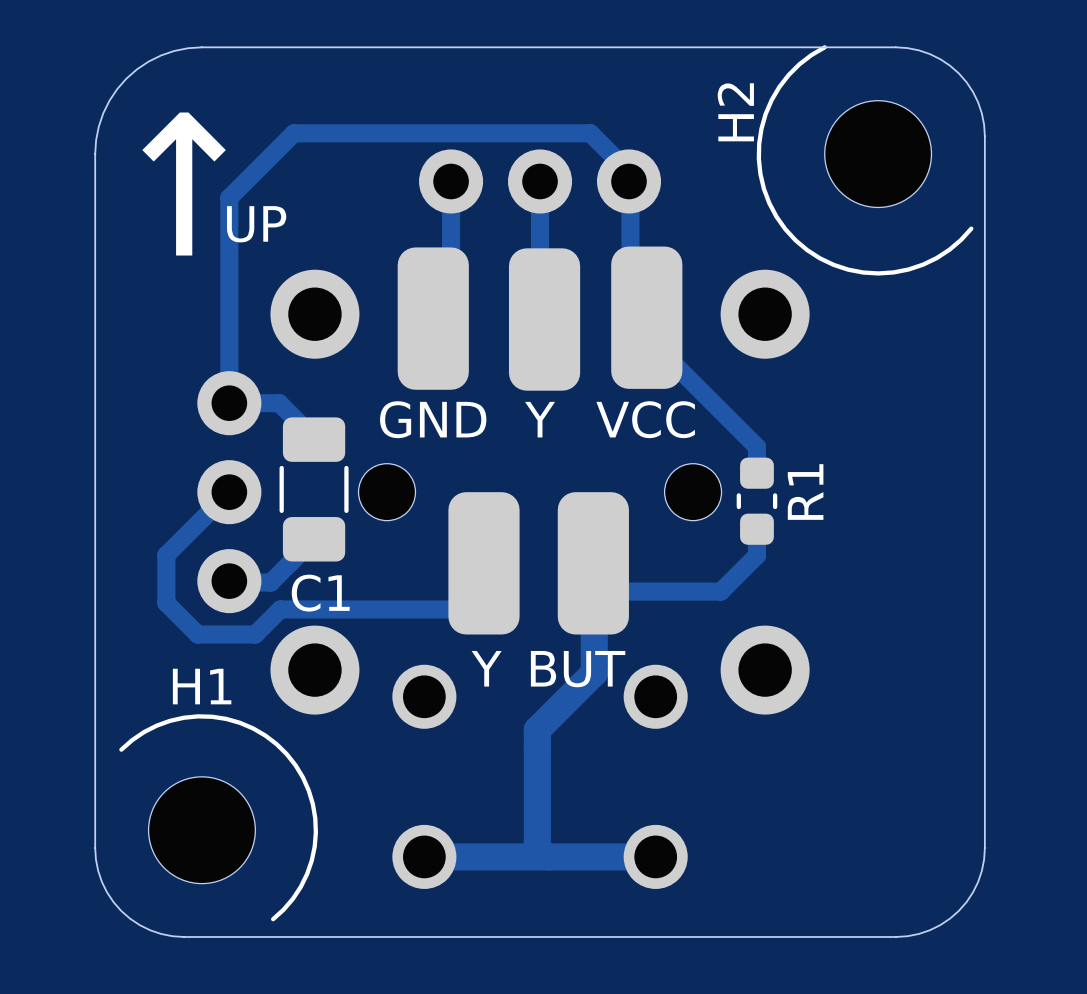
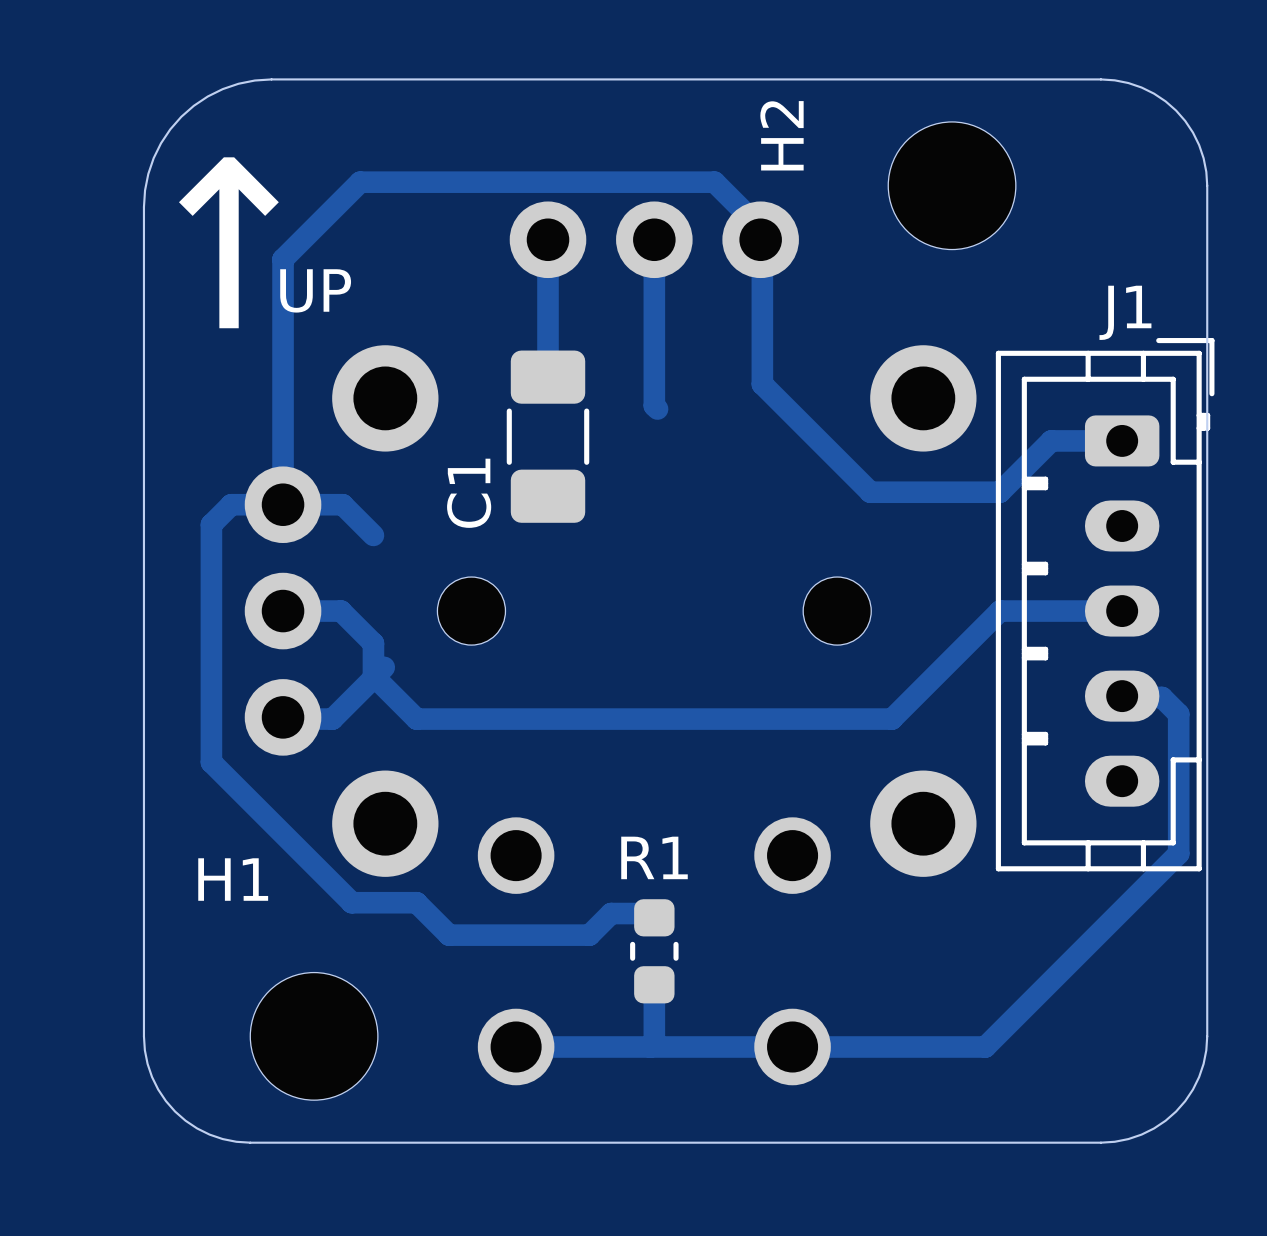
board edge: (219, 47) (188, 48) (174, 50) (161, 55) (136, 69) (117, 89) (103, 113) (96, 140) (95, 154) (95, 859) (101, 882) (107, 892) (113, 902) (130, 918) (150, 930) (161, 933) (201, 936) -> (271, 79) (254, 80) (222, 89) (207, 96) (181, 116) (161, 143) (153, 158) (145, 190) (143, 207) (144, 1050) (152, 1077) (158, 1089) (165, 1101) (185, 1120) (209, 1134) (222, 1139) (250, 1142)
line: (824, 47) (811, 54) (788, 75) (771, 100) (761, 128) (759, 143) (760, 174) (769, 203) (785, 229) (807, 250) (833, 264) (863, 272) (878, 273) (908, 269) (922, 264) (949, 249) (971, 228) -> none
board edge: (895, 47) (907, 48) (929, 54) (950, 65) (958, 73) (966, 82) (978, 102) (984, 124) (984, 136) (984, 859) (978, 882) (972, 892) (966, 902) (950, 918) (929, 930) (918, 933) (895, 936) -> (1079, 79) (1114, 80) (1128, 83) (1141, 87) (1165, 101) (1185, 121) (1192, 132) (1203, 158) (1207, 185) (1206, 1050) (1199, 1077) (1192, 1089) (1185, 1101) (1165, 1120) (1141, 1134) (1128, 1139) (1114, 1141) (1079, 1142)
H2 position: (878, 154) -> (952, 185)
track: none -> (762, 384) (870, 492) (1000, 492) (1051, 440) (1122, 440)
part: (646, 317) -> none
part: (433, 318) -> none
part: (544, 319) -> none
track: (648, 329) (648, 338) (756, 446) (756, 473) -> none
track: none -> (283, 504) (231, 504) (211, 524) (211, 762) (351, 902) (416, 902) (449, 935) (589, 935) (611, 913) (654, 913)
text: GND (433, 419) -> none
text: Y (540, 419) -> none
text: VCC (645, 419) -> none
J1: none -> (1105, 604)
C1 position: (314, 489) -> (548, 436)
track: (229, 492) (166, 555) (166, 603) (197, 634) (255, 634) (280, 609) (458, 609) (468, 598) -> (283, 611) (341, 611) (373, 643) (373, 675) (416, 719) (891, 719) (1000, 611) (1118, 611)
R1 name rotation: 0° (805, 492) -> 90° clockwise (654, 857)
R1 position: (756, 501) -> (654, 951)
track: (756, 529) (756, 555) (720, 591) (594, 591) (594, 672) (537, 729) (537, 844) -> none
part: (483, 563) -> none
part: (593, 563) -> none
track: none -> (1118, 697) (1162, 697) (1178, 714) (1178, 853) (985, 1047) (793, 1047)
C1 name rotation: 0° (320, 593) -> 90° counterclockwise (469, 493)
C1 name position: C1 (320, 593) -> C1 (469, 493)
text: Y (486, 668) -> none
text: BUT (578, 669) -> none
H1 name position: H1 (202, 686) -> H1 (233, 879)
line: (121, 749) (132, 740) (156, 725) (183, 717) (212, 716) (226, 718) (253, 728) (265, 735) (286, 754) (303, 777) (312, 804) (315, 818) (314, 846) (311, 860) (300, 886) (292, 898) (273, 919) -> none
track: none -> (654, 984) (654, 1043) (650, 1047)
H1 position: (201, 830) -> (314, 1036)
track width: thick (424, 856) (656, 856) -> thin (516, 1047) (793, 1047)

